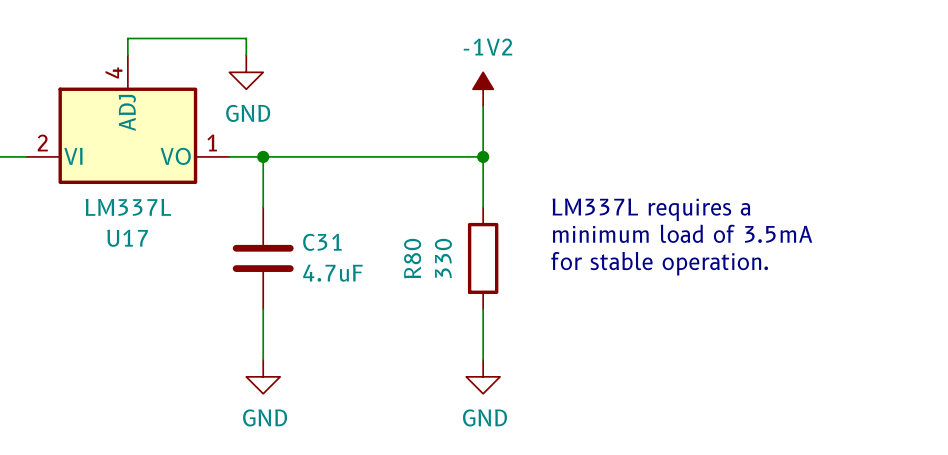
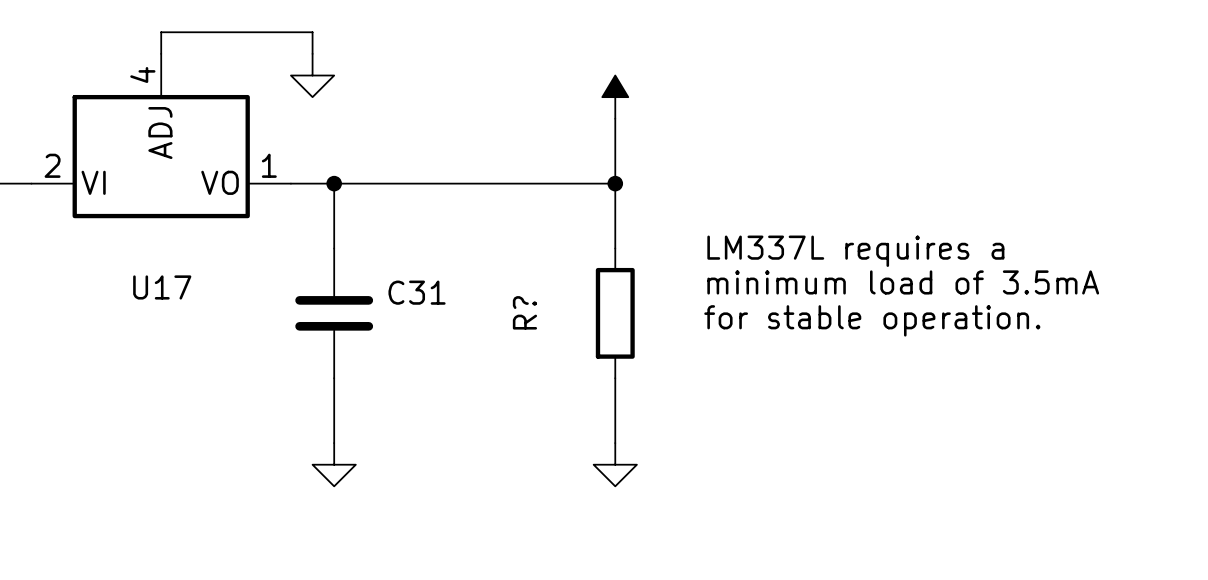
power symbol text: -1V2 (487, 47) -> none
power symbol text: GND (248, 113) -> none
U17 value: LM337L (128, 207) -> none
R80 name: R80 (412, 258) -> R? (524, 312)
R80 value: 330 (443, 258) -> none
C31 value: 4.7uF (332, 273) -> none
power symbol text: GND (265, 417) -> none
power symbol text: GND (484, 417) -> none

